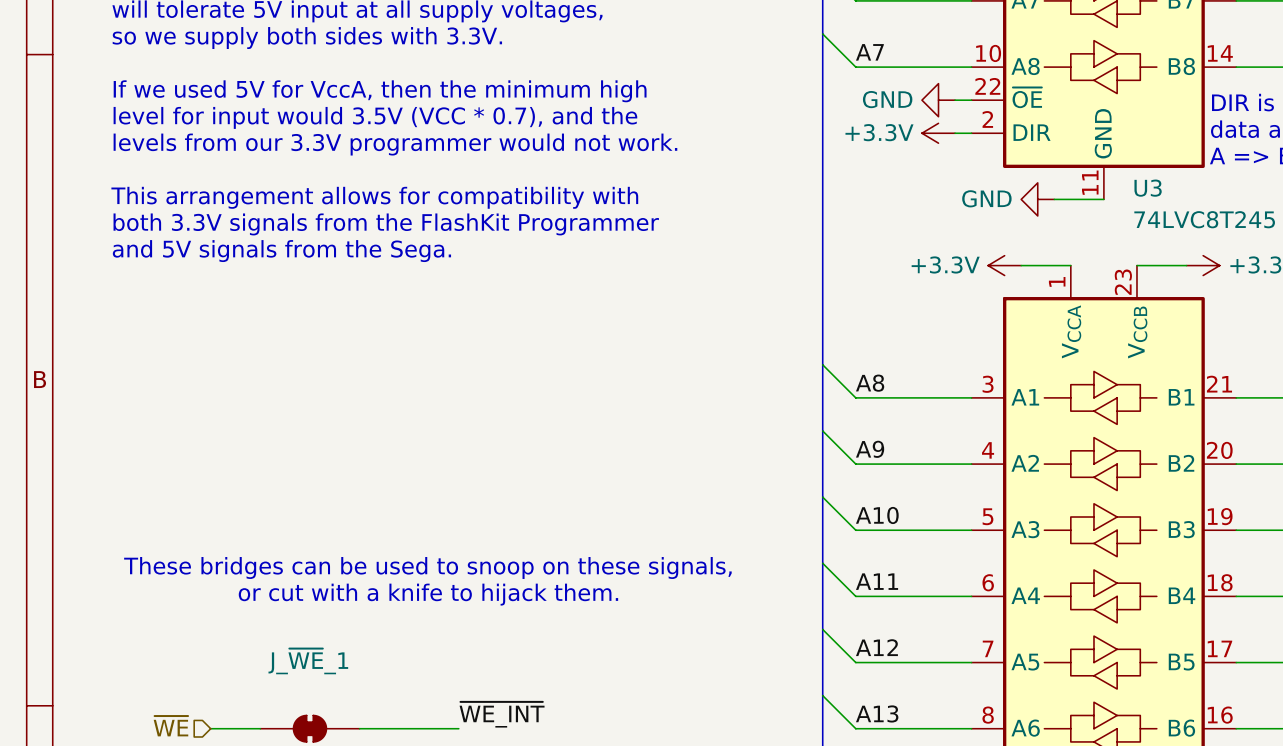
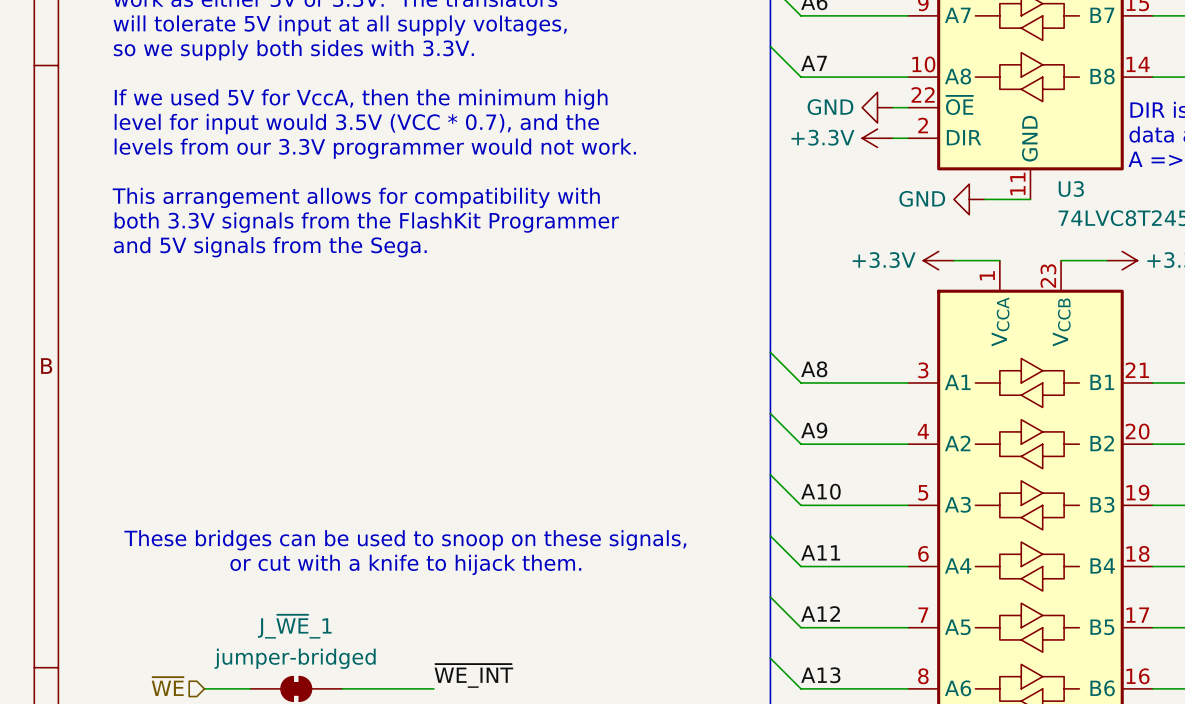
J_~{WE}_1 value: none -> jumper-bridged (295, 658)

